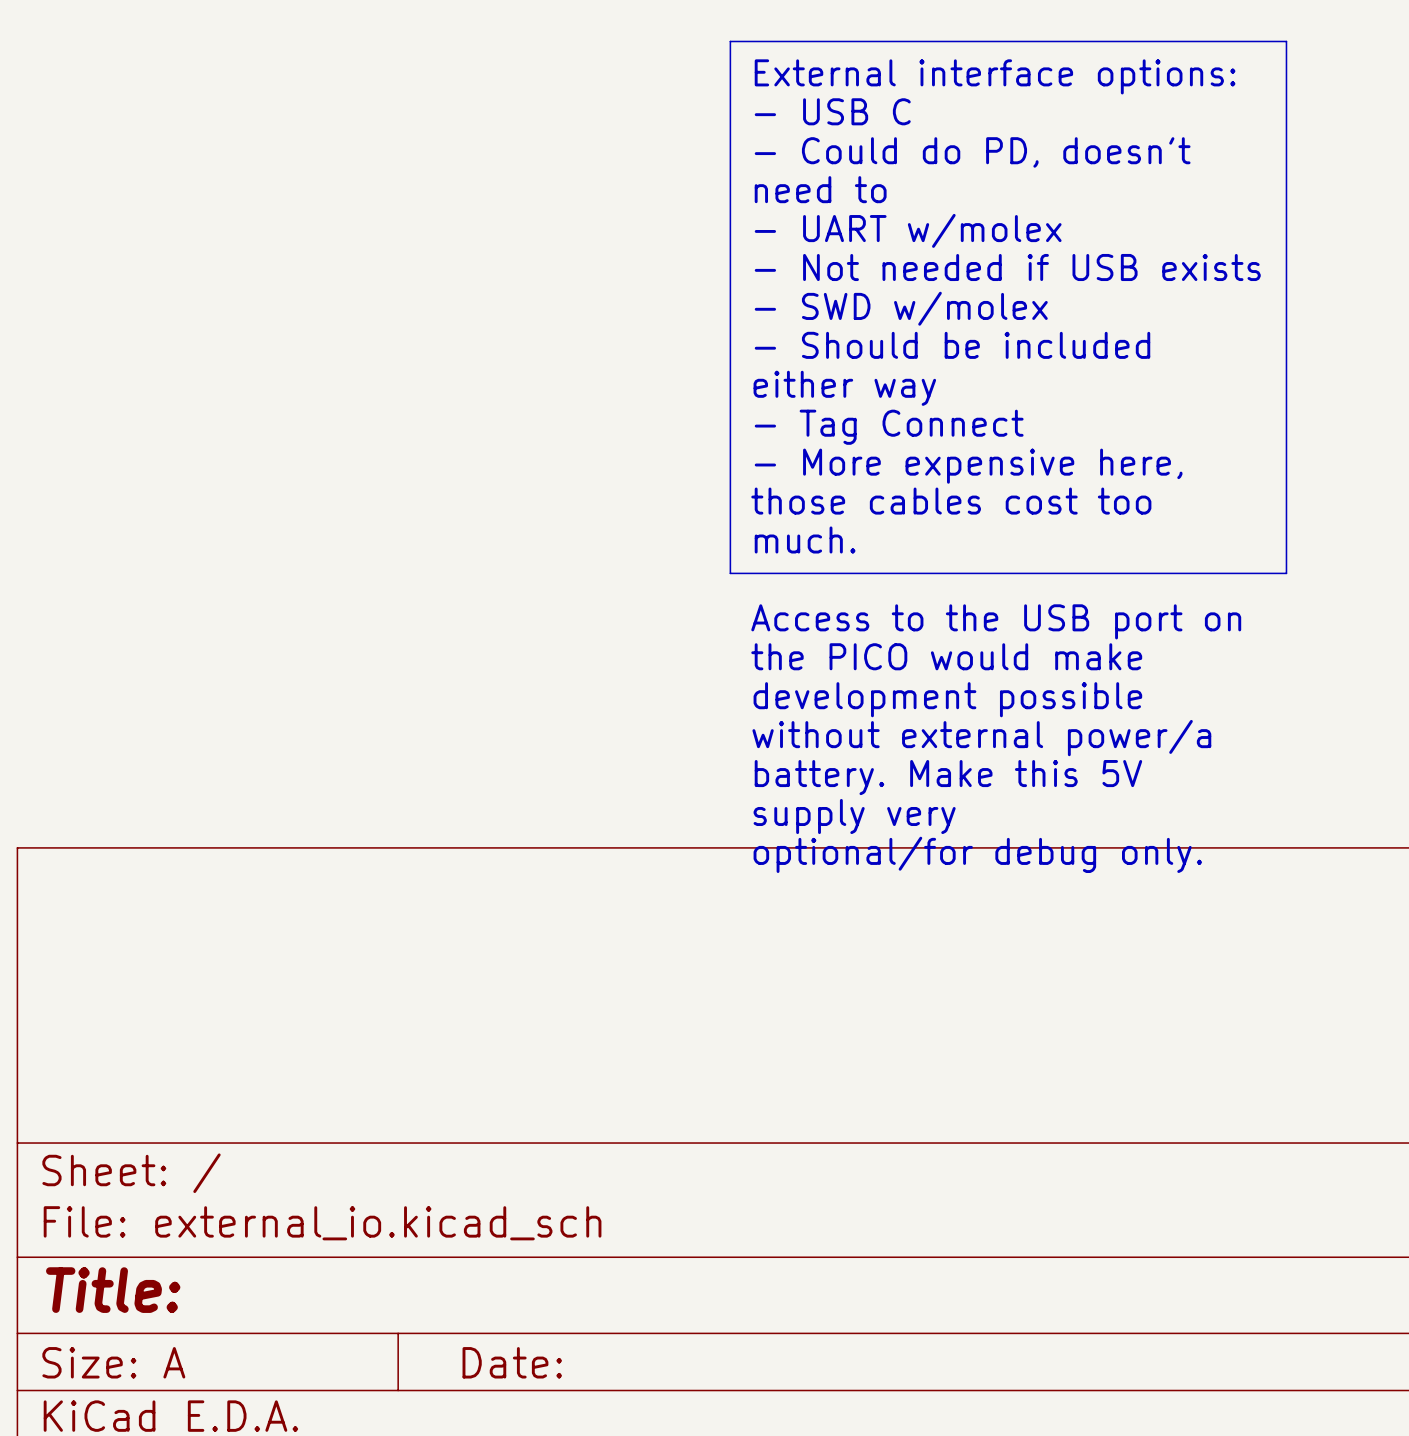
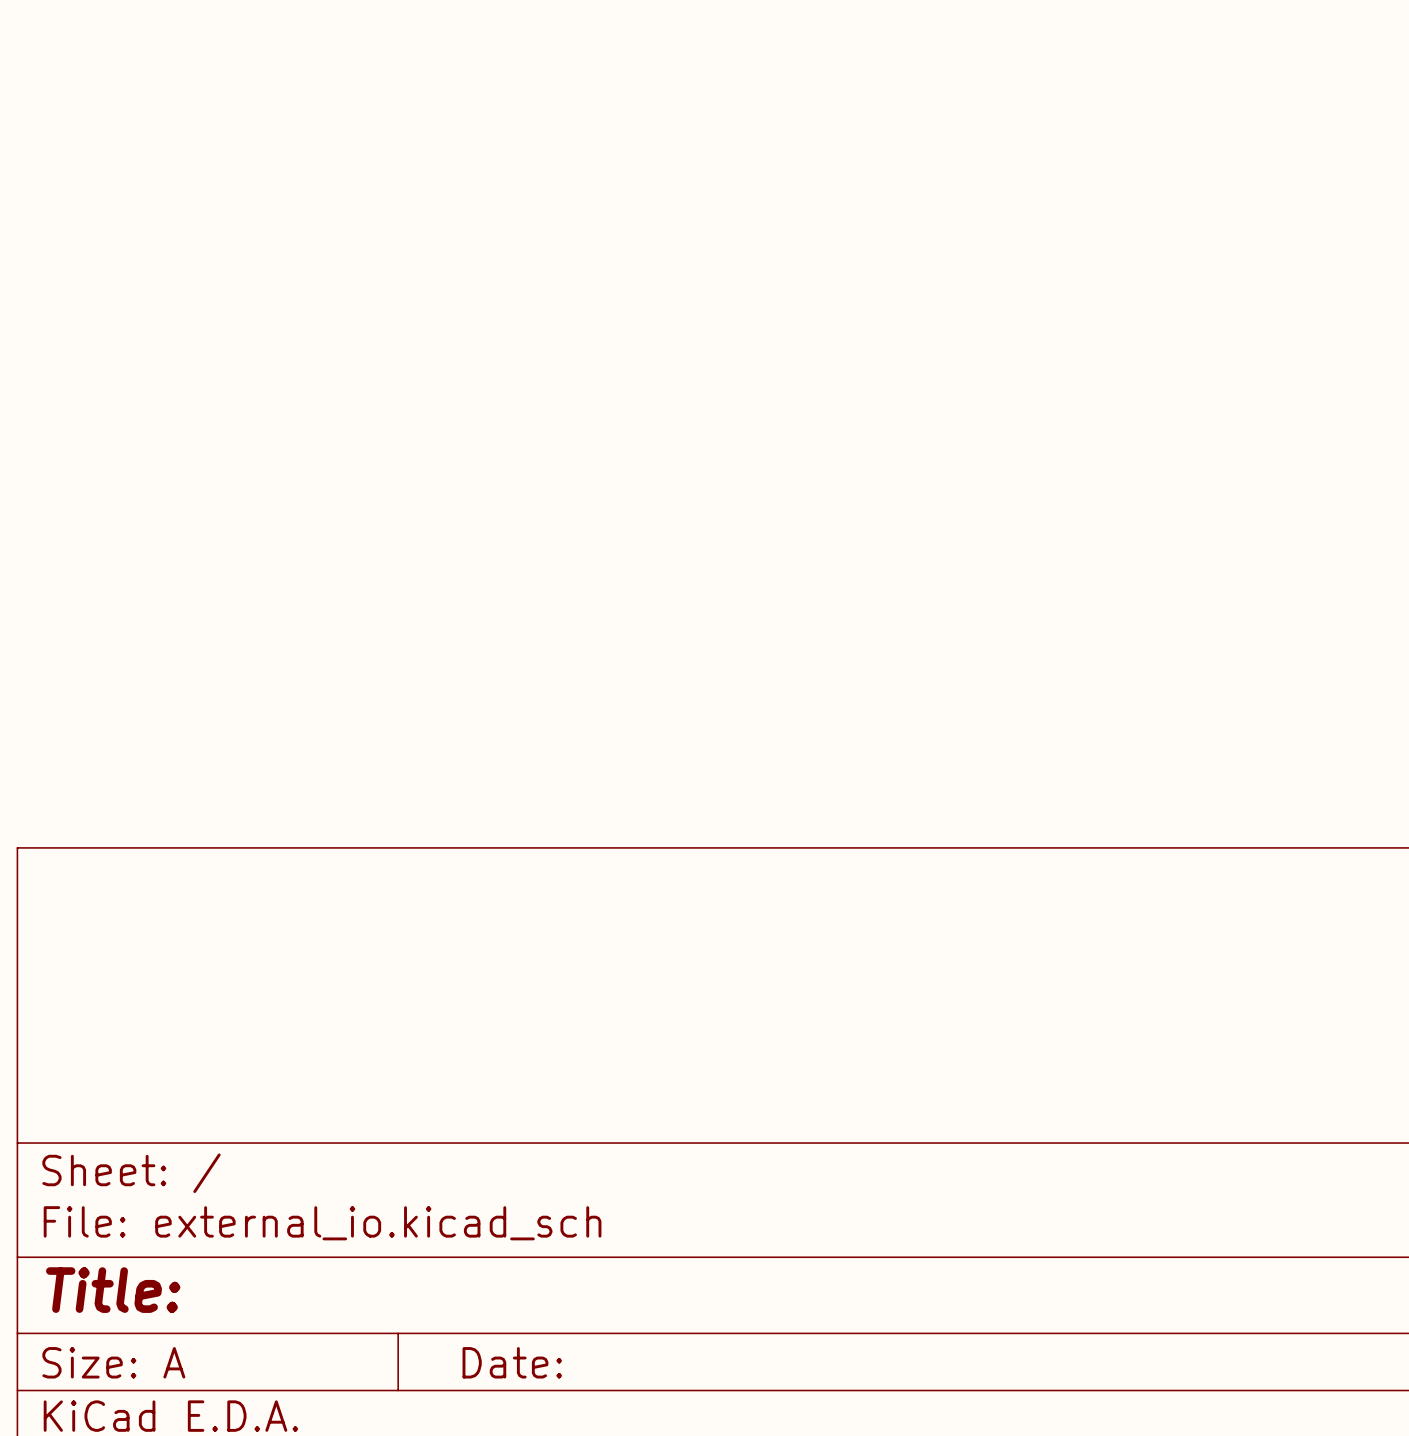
line: (730, 41) (1286, 41) (1286, 573) (730, 573) (730, 41) -> none
text: External interface options: (995, 76) -> none
text: - USB C (832, 111) -> none
text: - Could do PD, doesn't (972, 152) -> none
text: need to (820, 189) -> none
text: - UART w/molex (908, 230) -> none
text: - Not needed if USB exists (1007, 267) -> none
text: - SWD w/molex (901, 308) -> none
text: - Should be included (952, 345) -> none
text: either way (844, 388) -> none
text: - Tag Connect (889, 427) -> none
text: - More expensive here, (968, 466) -> none
text: those cables cost too (951, 501) -> none
text: much. (805, 539) -> none
text: Access to the USB port on (996, 621) -> none
text: the PICO would make (946, 656) -> none
text: development possible (947, 699) -> none
text: without external power/a (981, 738) -> none
text: battery. Make this 5V (948, 777) -> none
text: supply very (854, 816) -> none
text: optional/for debug only. (977, 854) -> none

